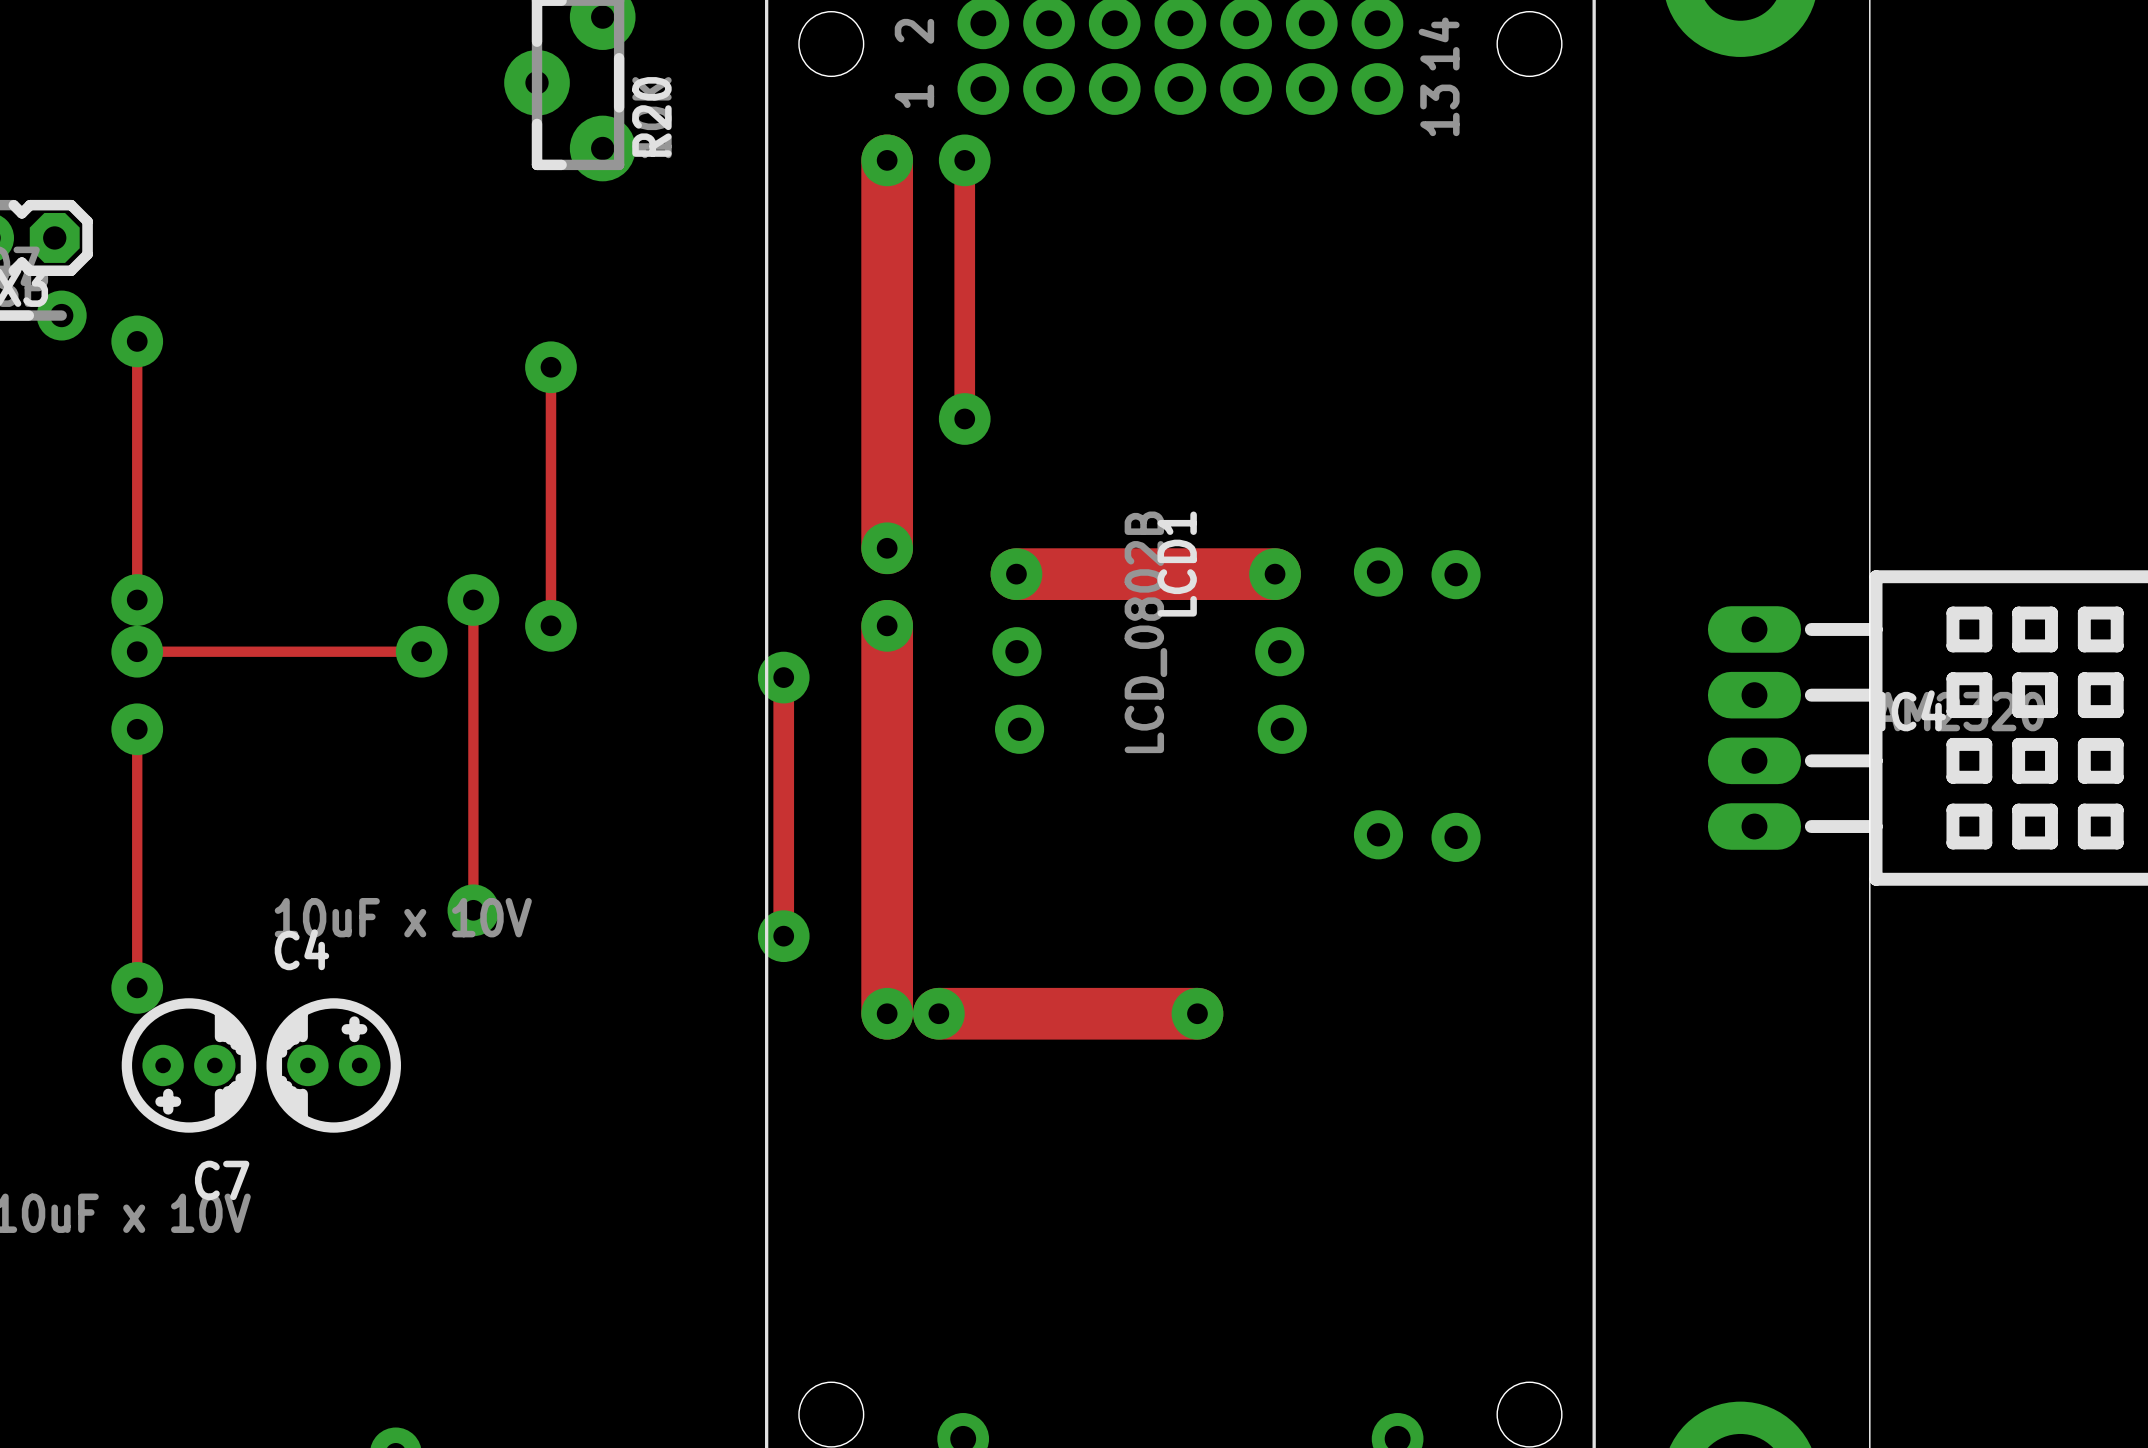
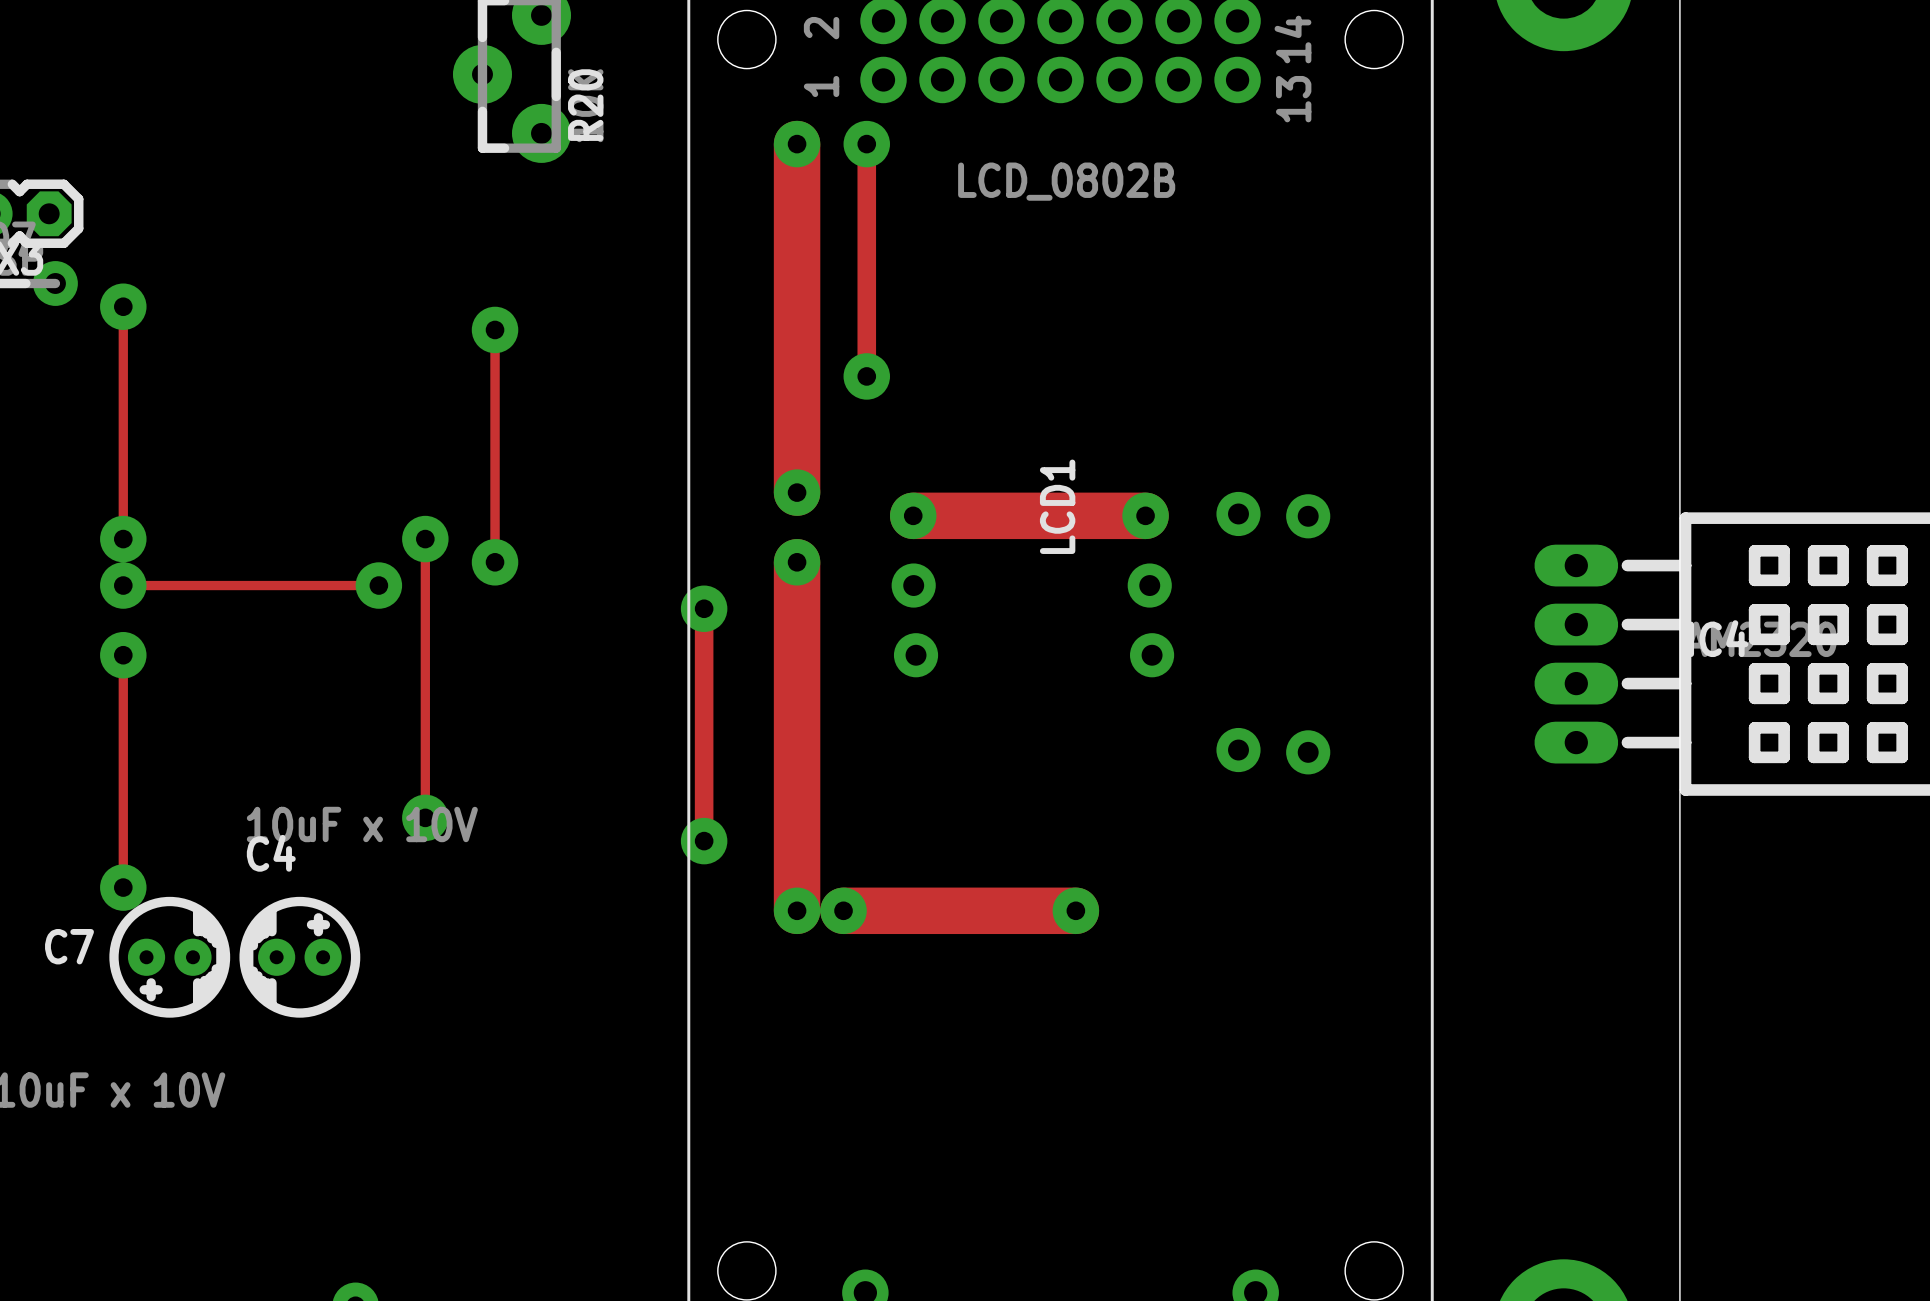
LCD1 value rotation: 0° (1145, 632) -> 90° clockwise (1066, 181)
LCD1 value position: LCD_0802B (1145, 632) -> LCD_0802B (1066, 181)
C7 name position: C7 (222, 1180) -> C7 (69, 946)

